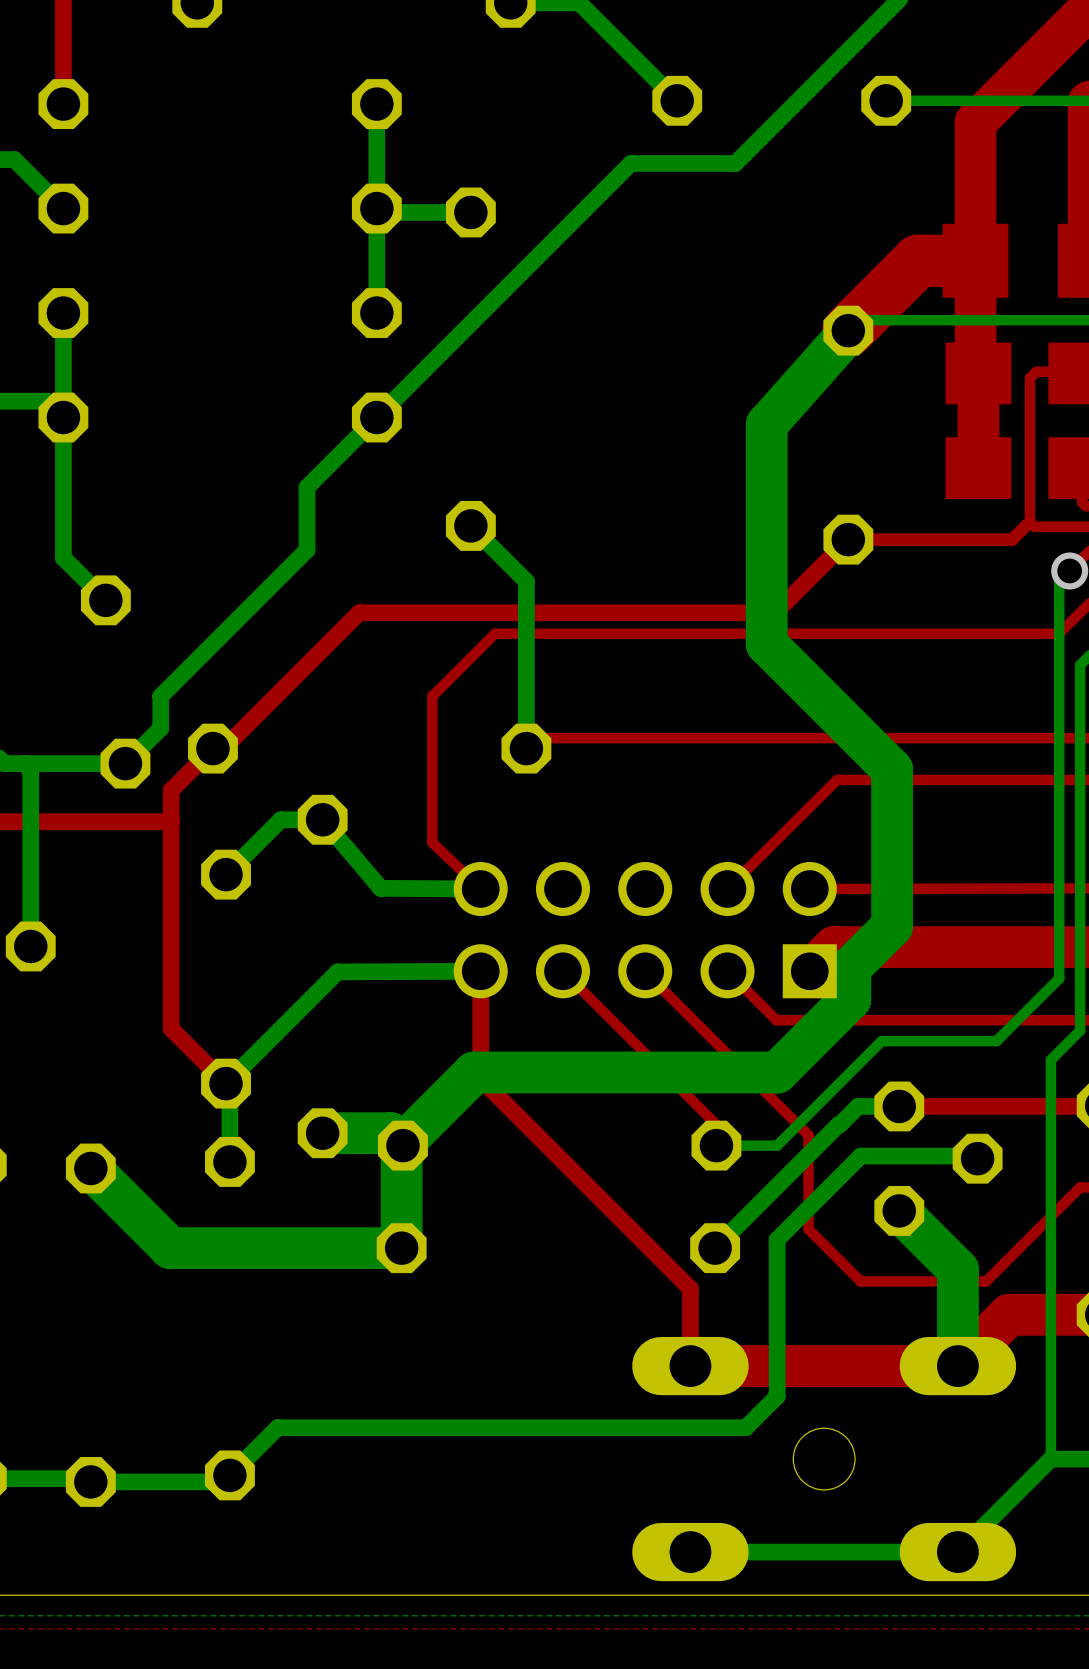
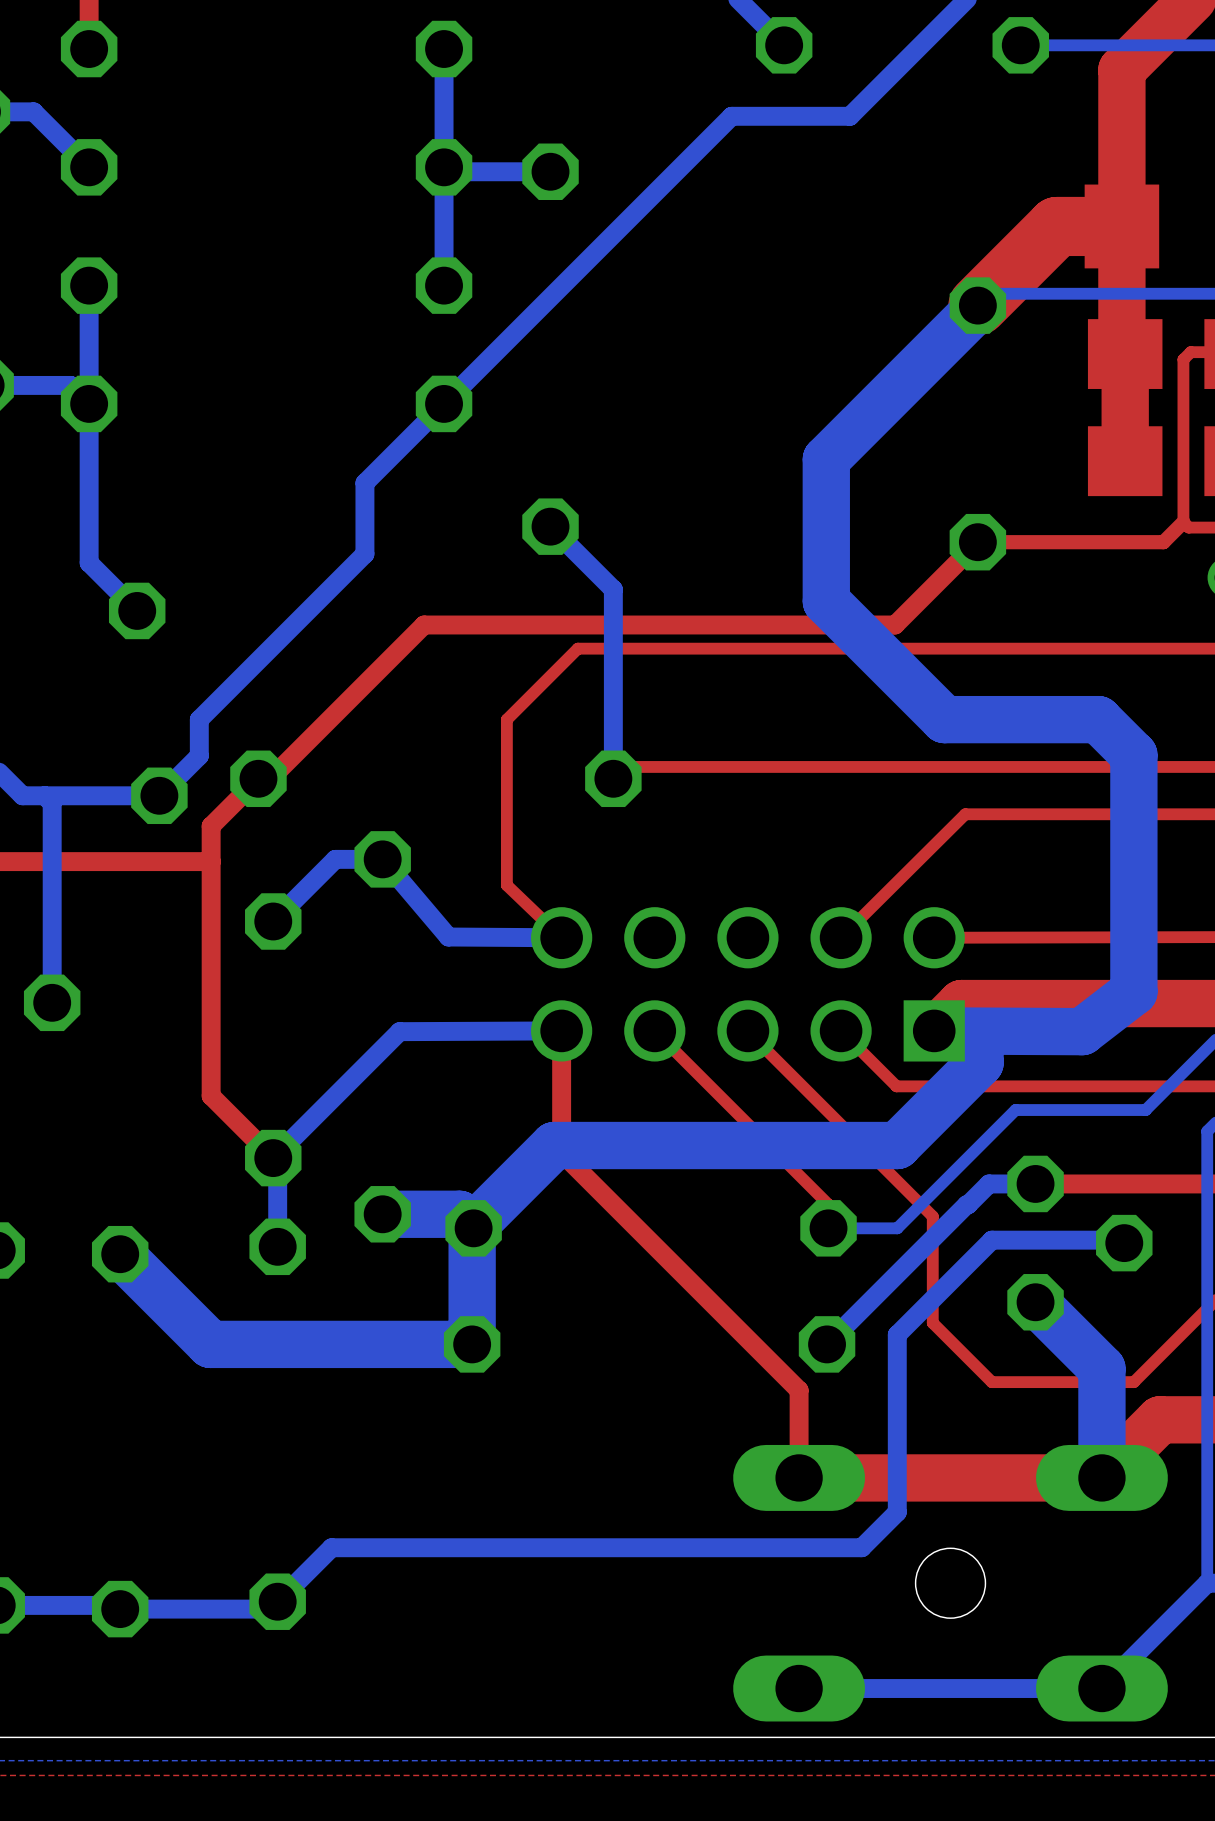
bottom track: (848, 332) (766, 424) (766, 644) -> (977, 307) (826, 459) (826, 601) (885, 660)
bottom track: (818, 696) (892, 769) (892, 926) (847, 971) (809, 971) -> (944, 719) (1098, 719) (1133, 755) (1133, 991) (1082, 1031) (934, 1030)

